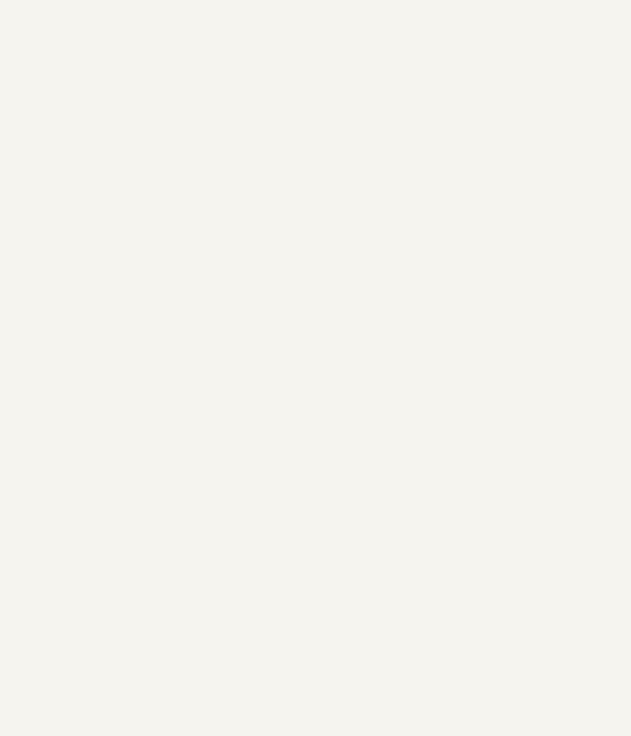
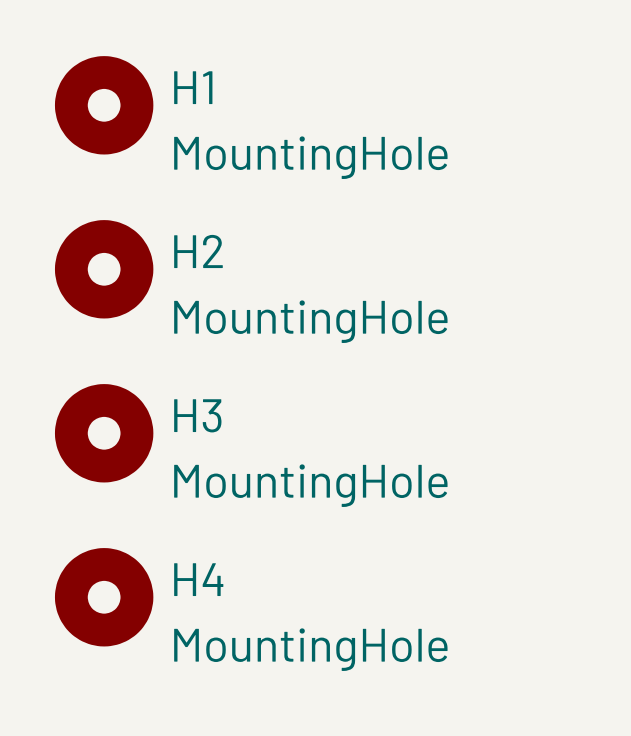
H1: none -> MountingHole (104, 105)
H2: none -> MountingHole (104, 269)
H3: none -> MountingHole (104, 433)
H4: none -> MountingHole (104, 597)

